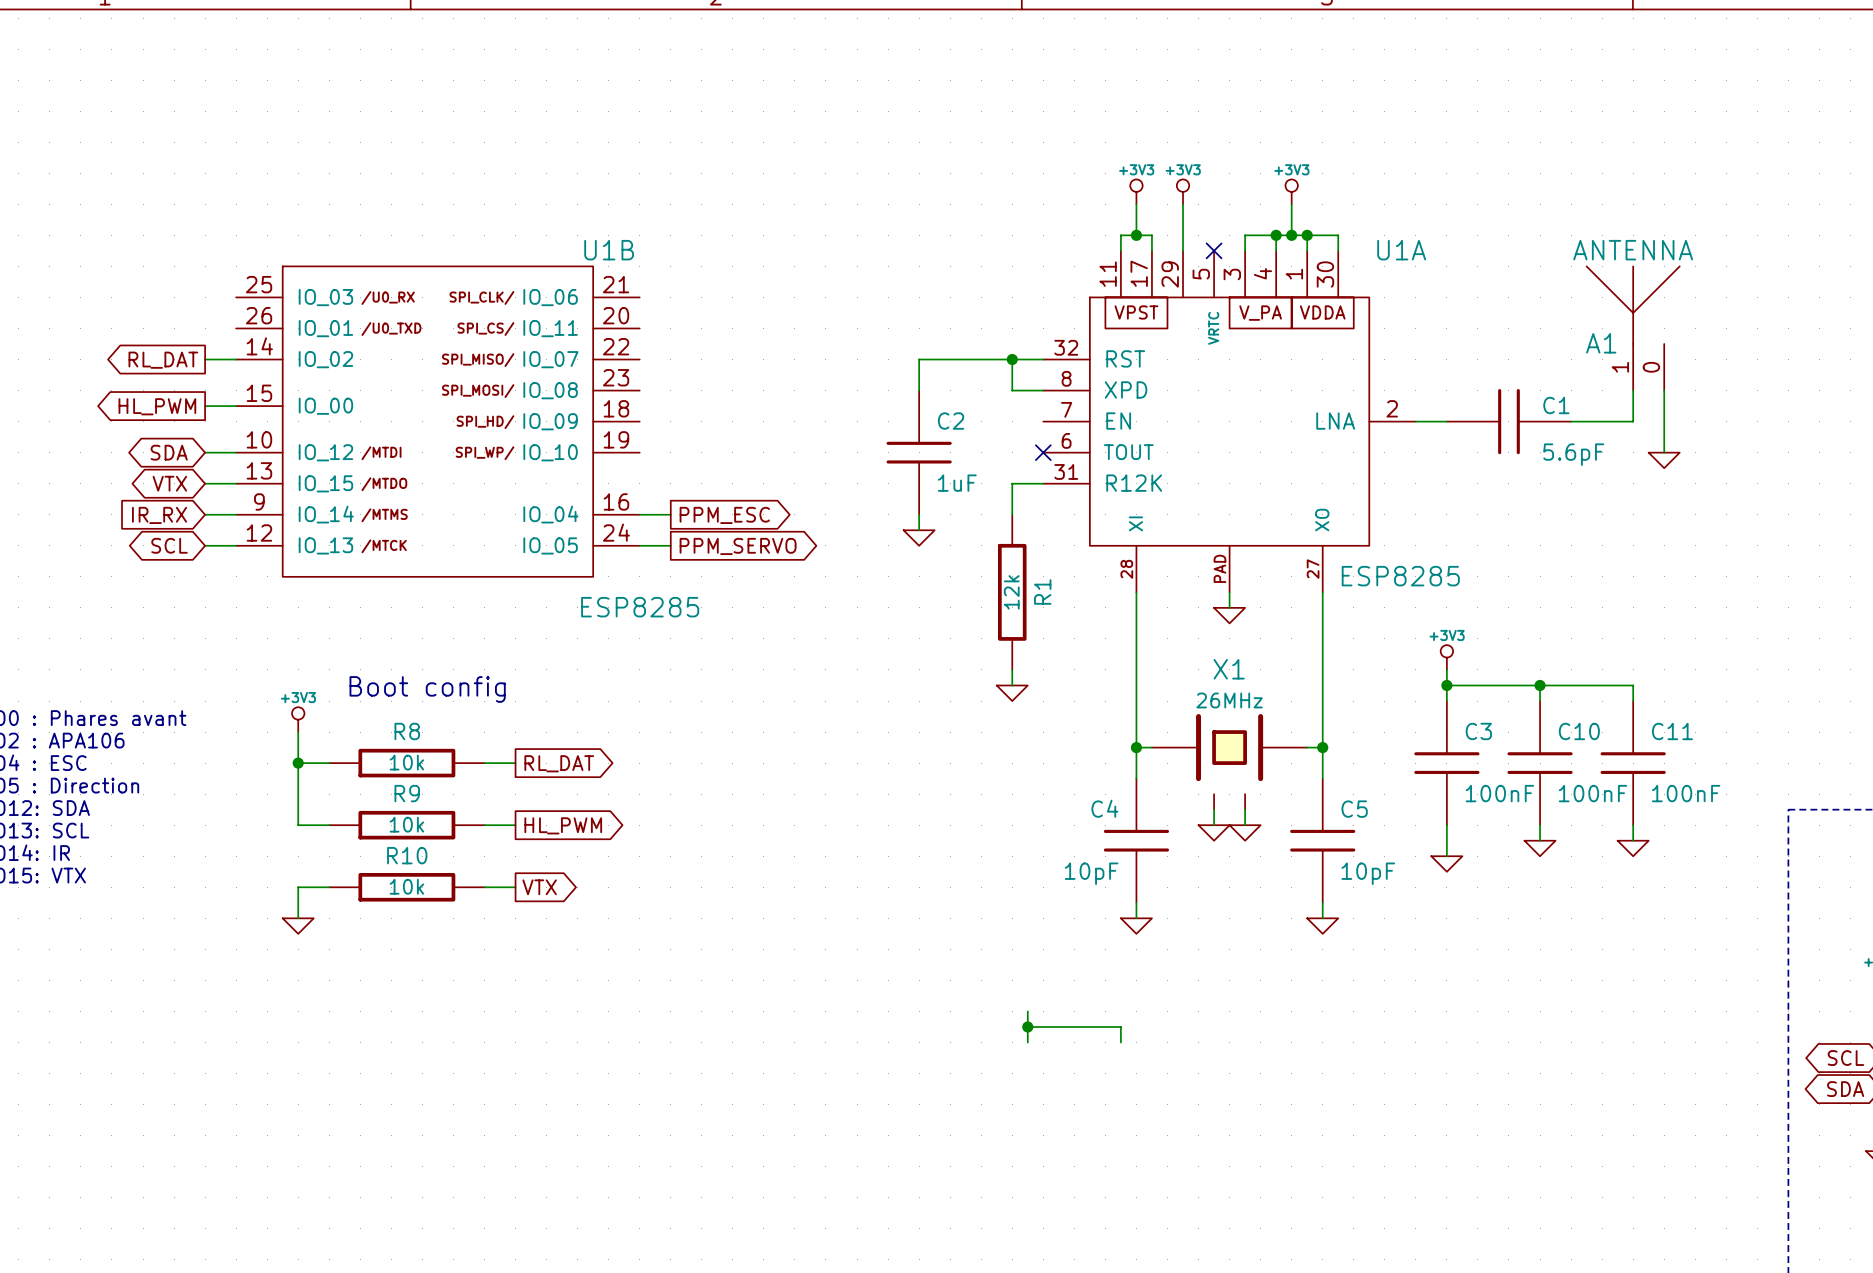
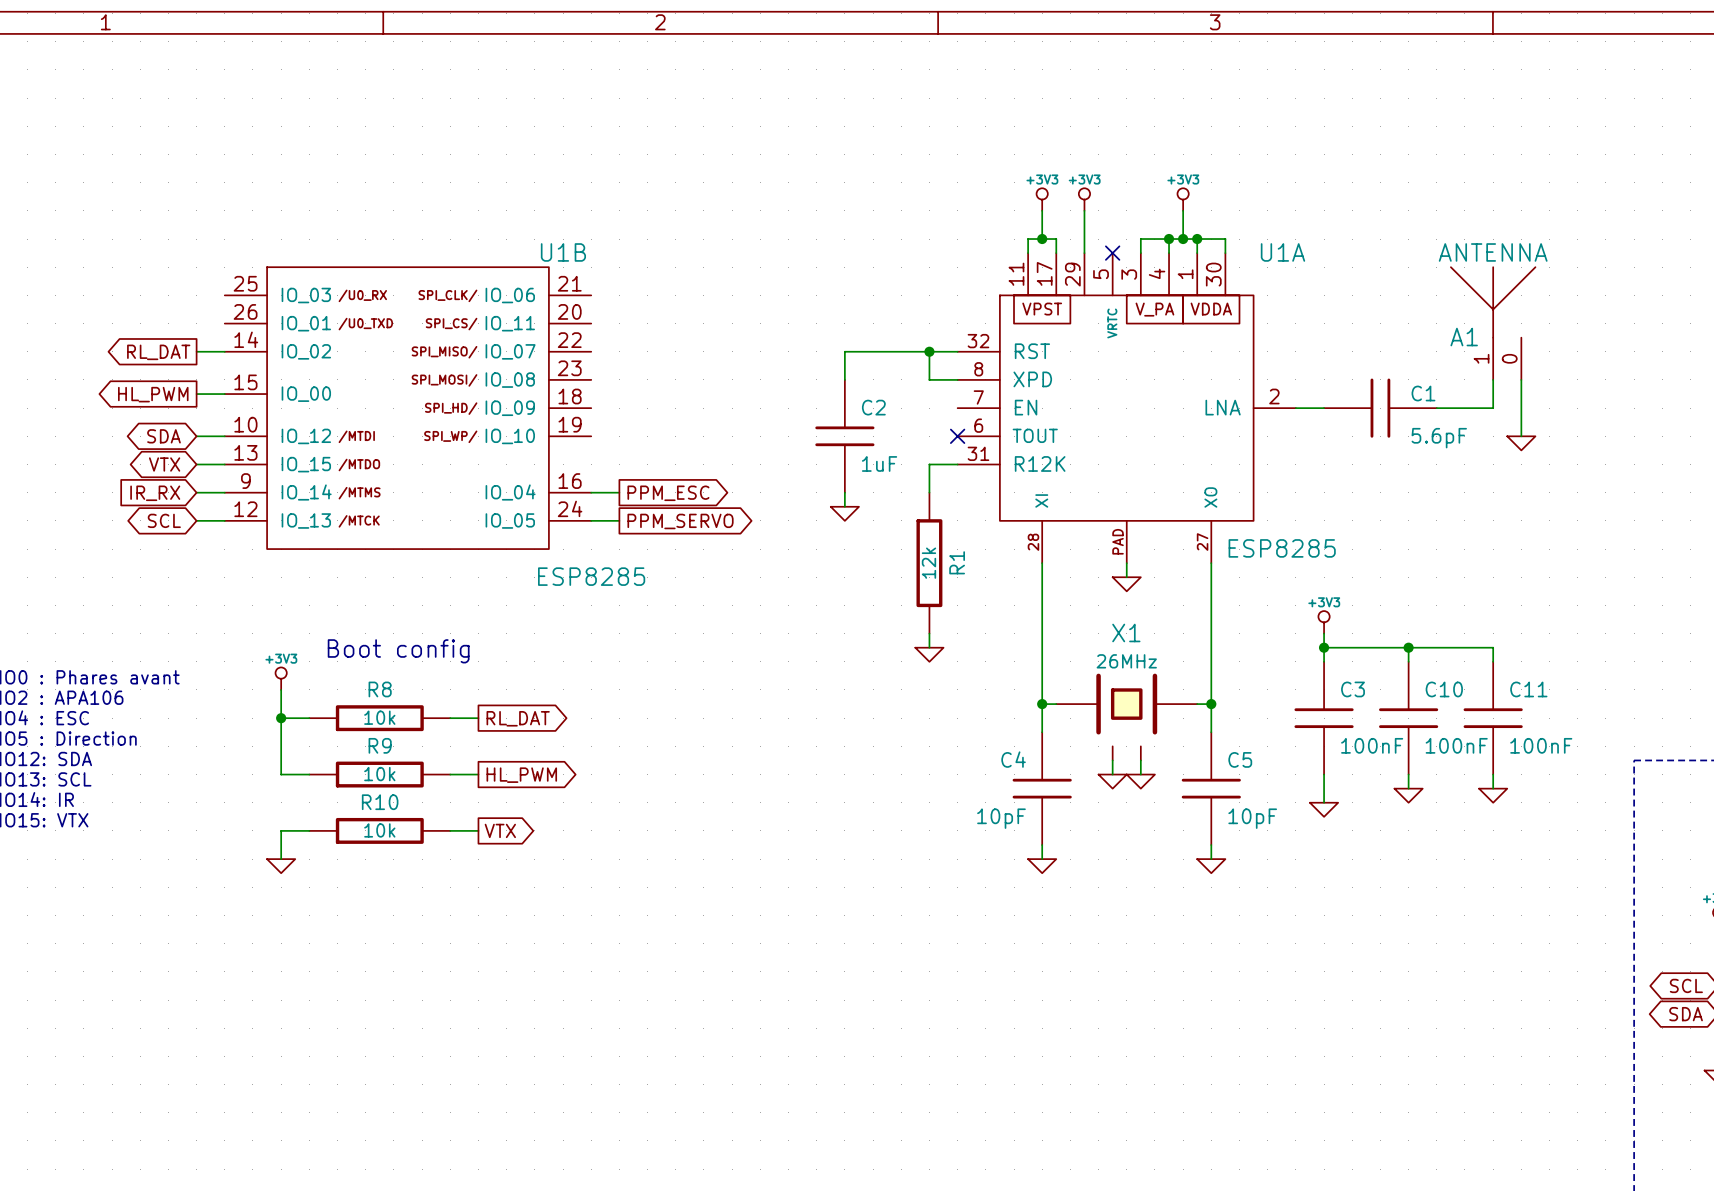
wire: (1027, 1011) (1027, 1042) -> none
wire: (1027, 1026) (1120, 1026) (1120, 1042) -> none
junction: (1027, 1026) -> none

